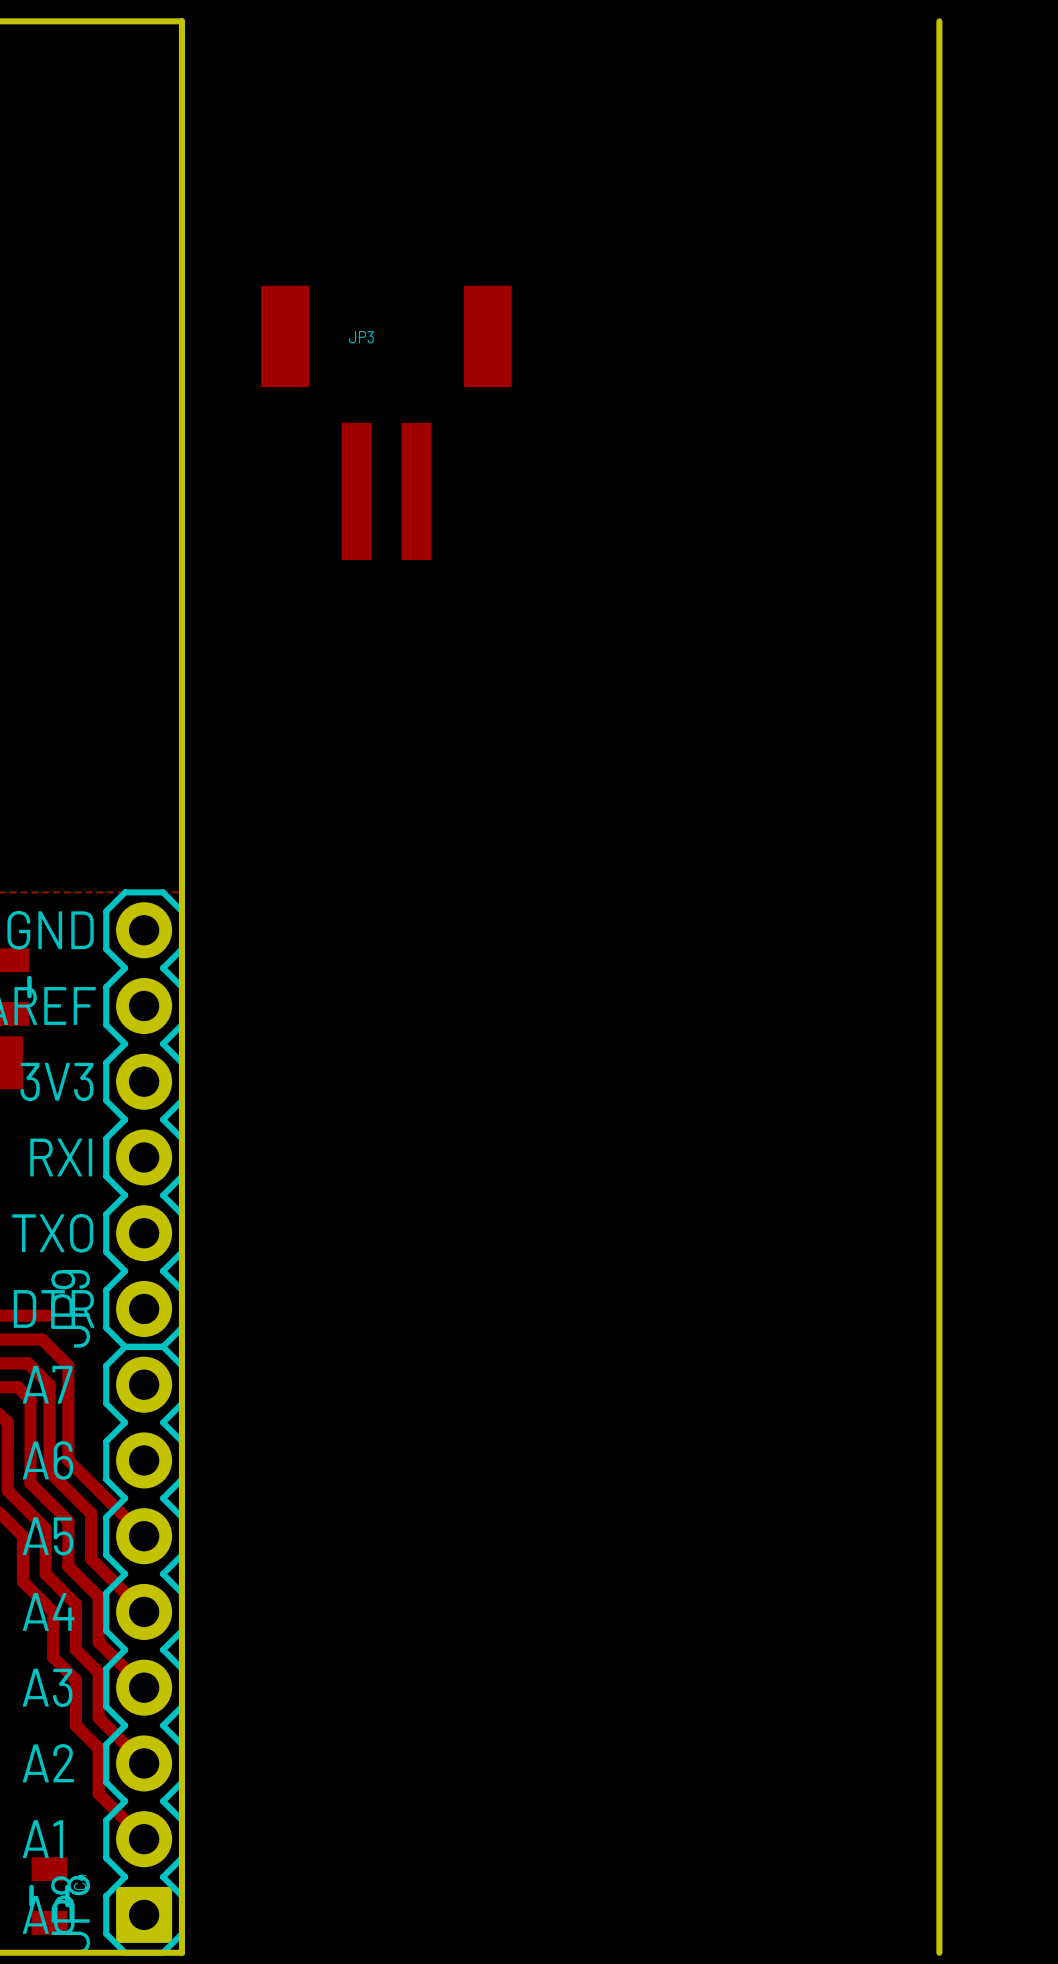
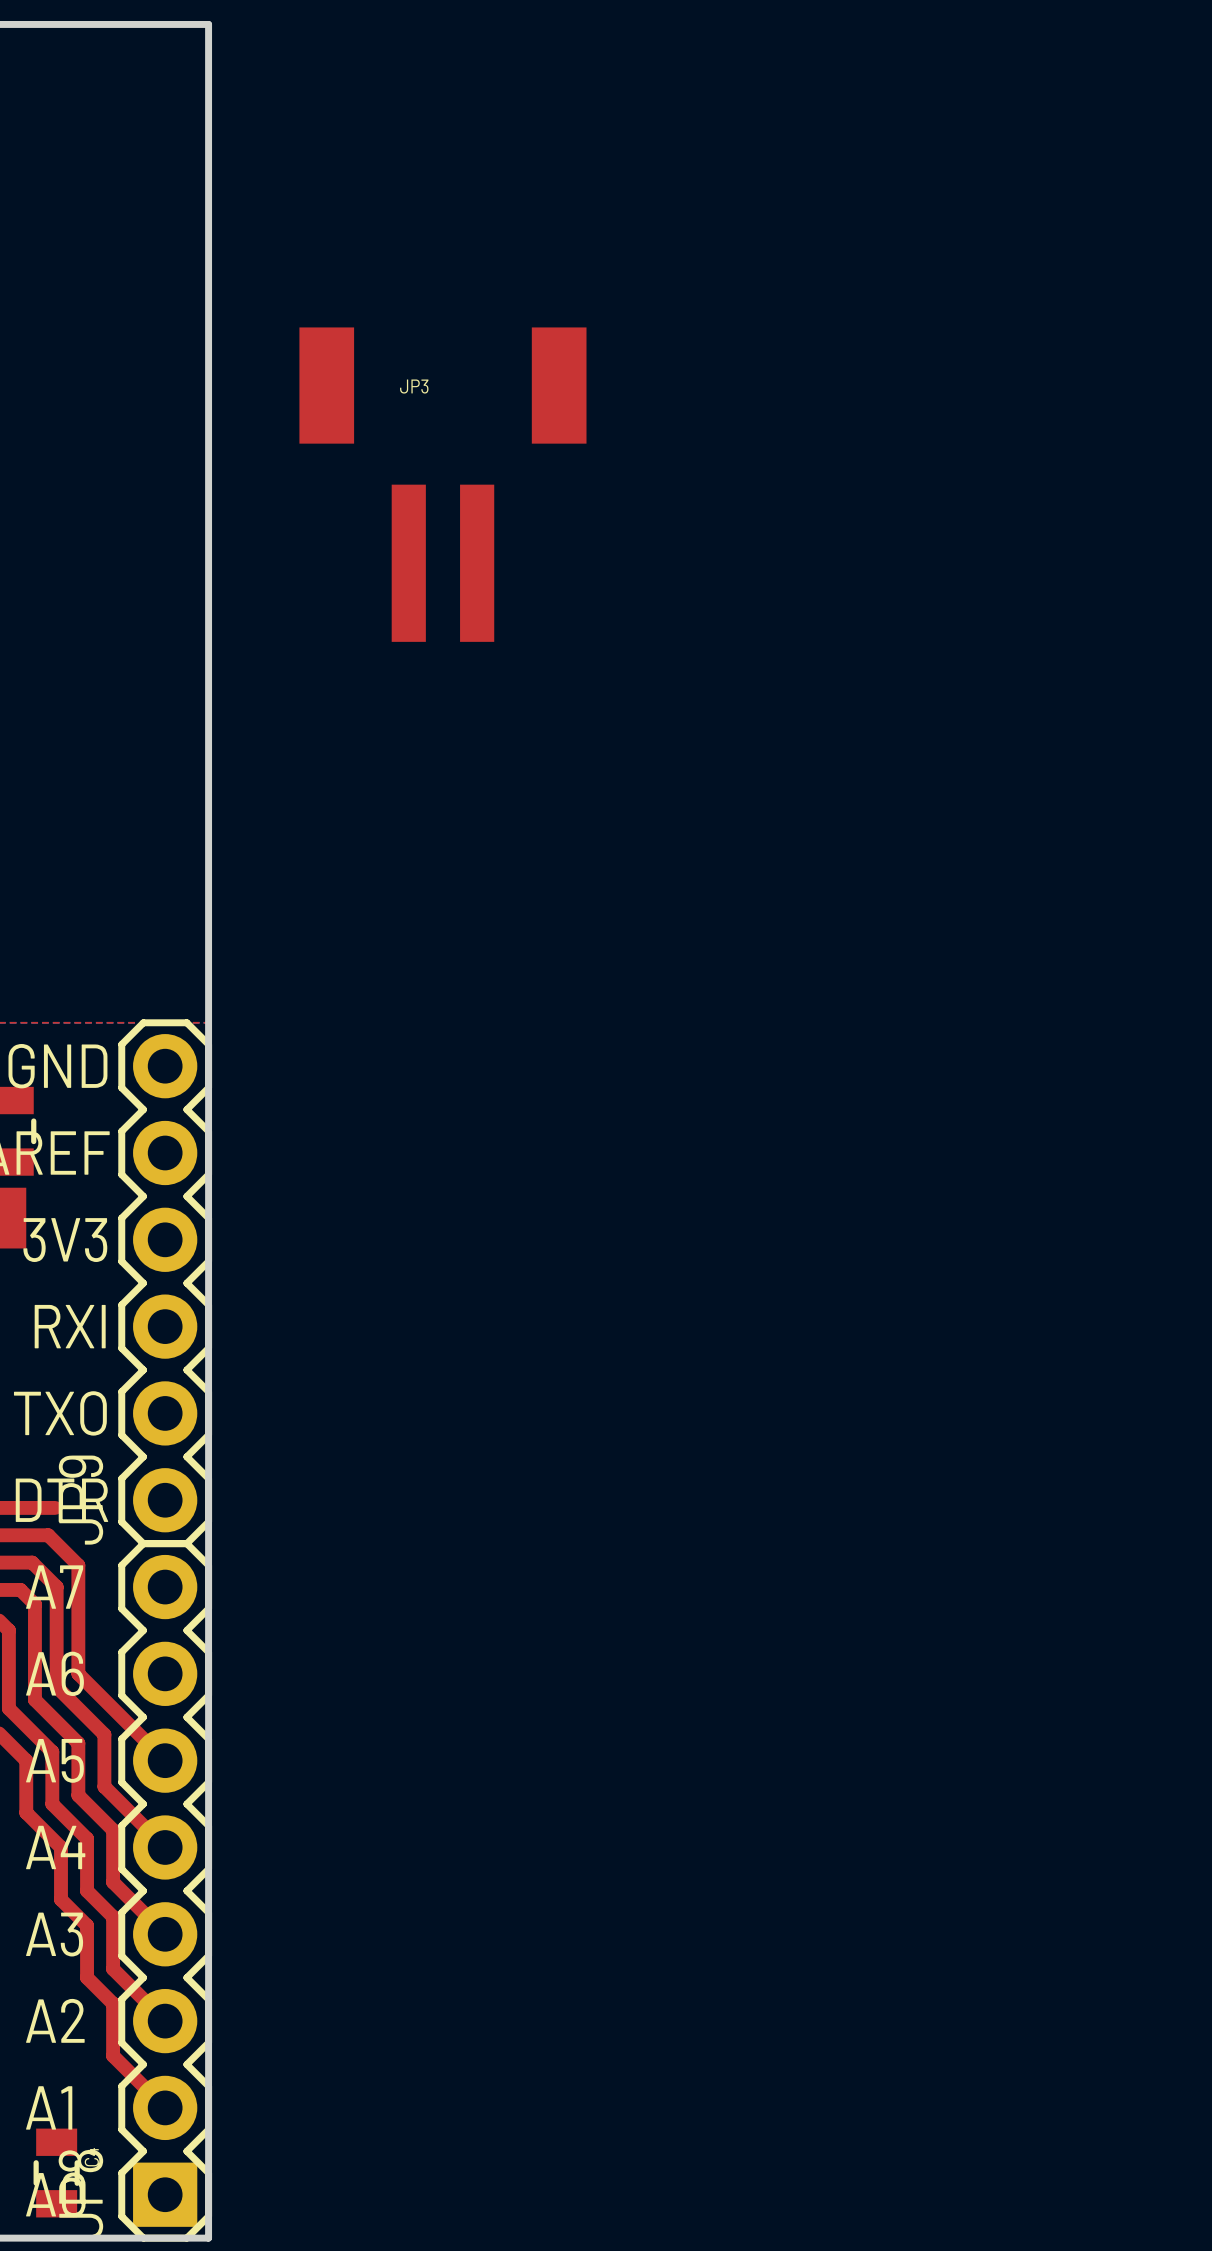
board edge: (939, 21) (939, 1952) -> none

